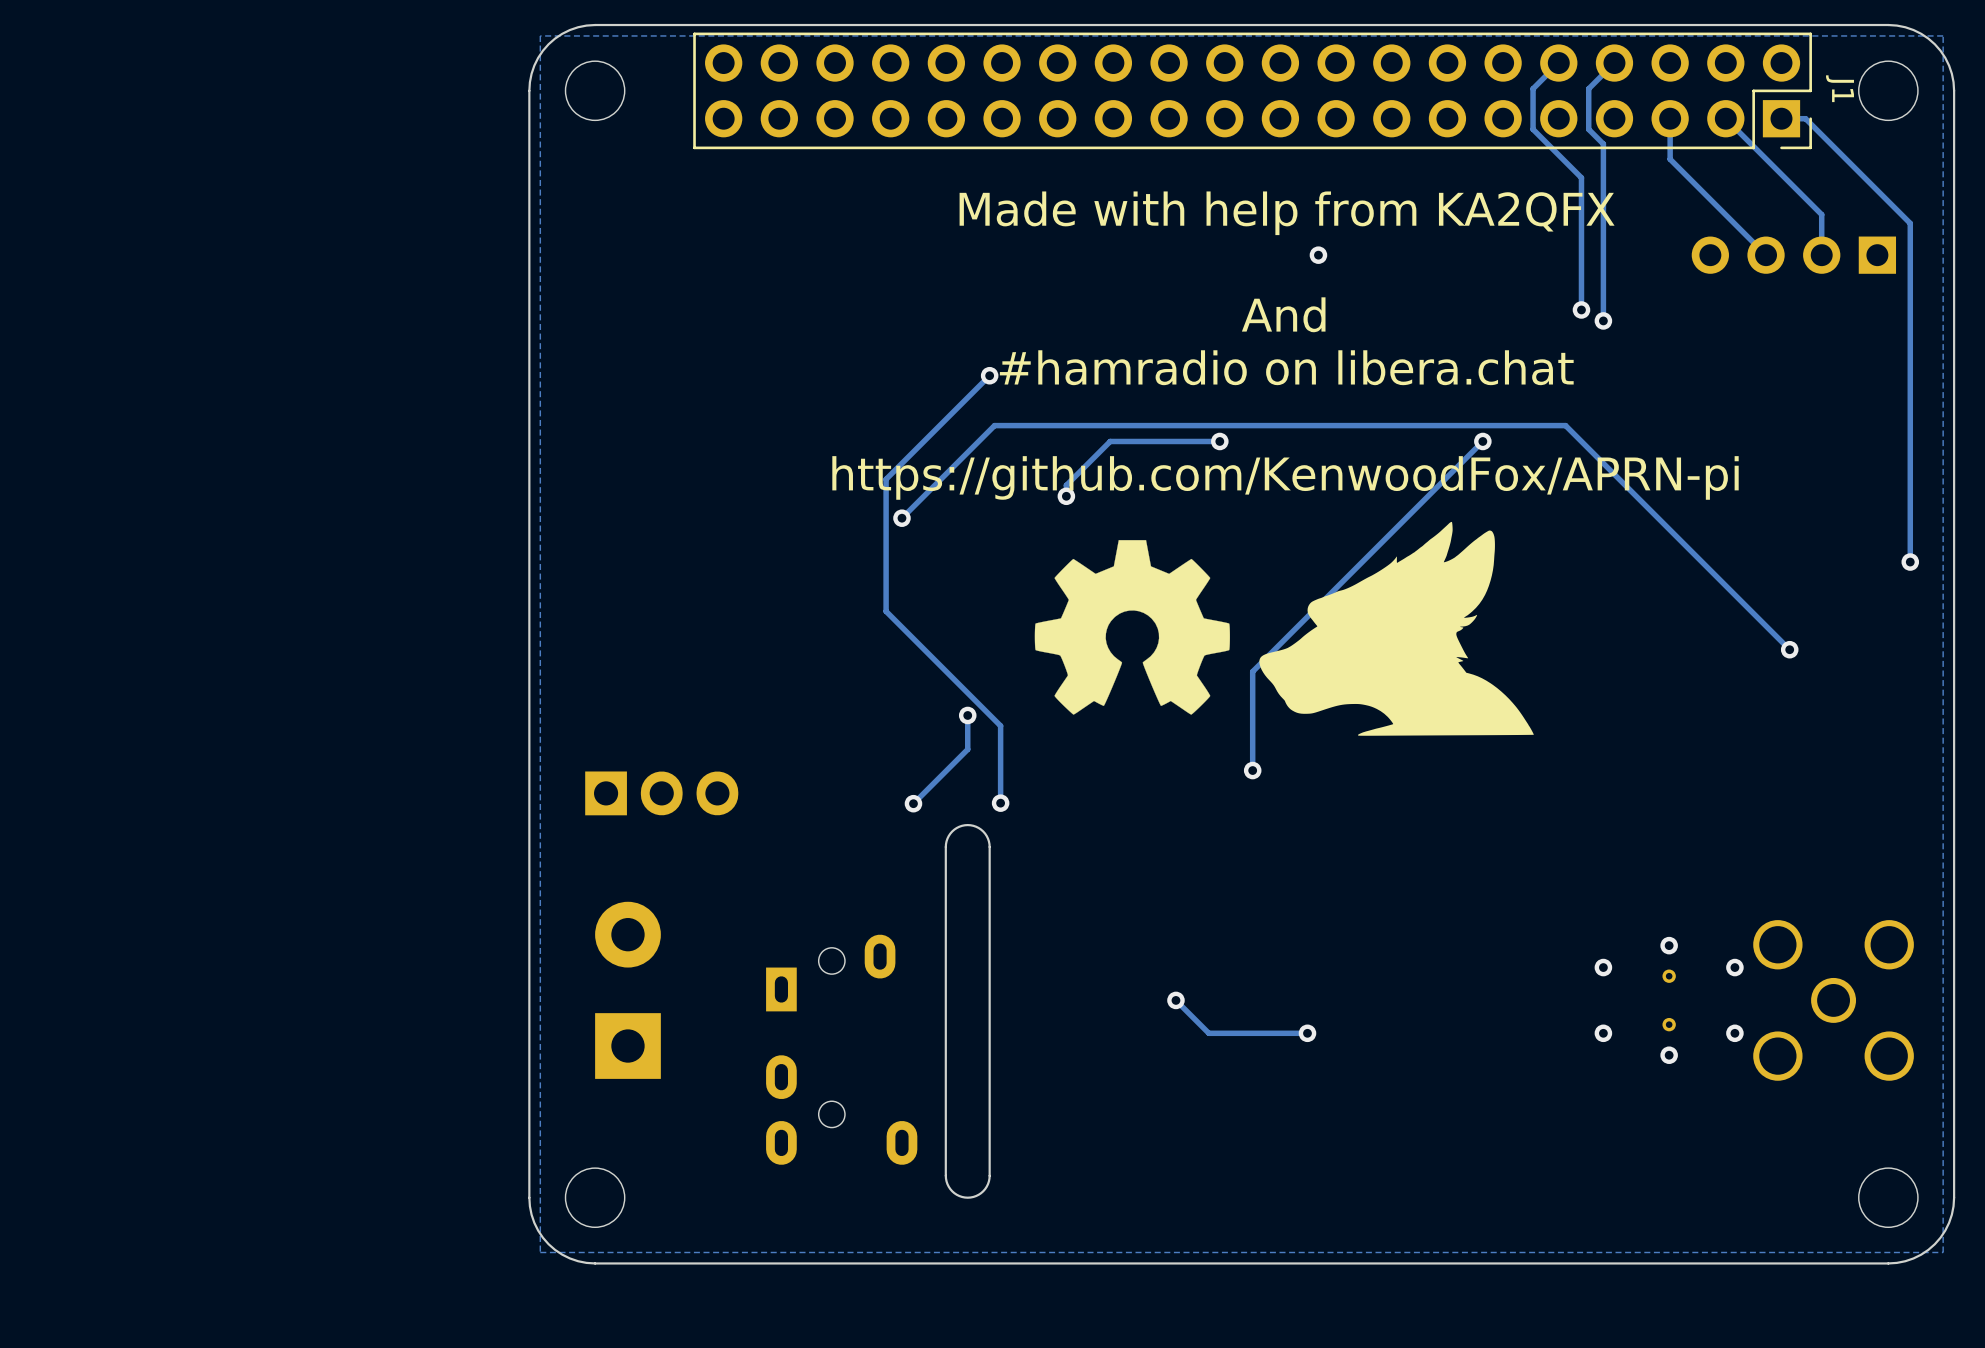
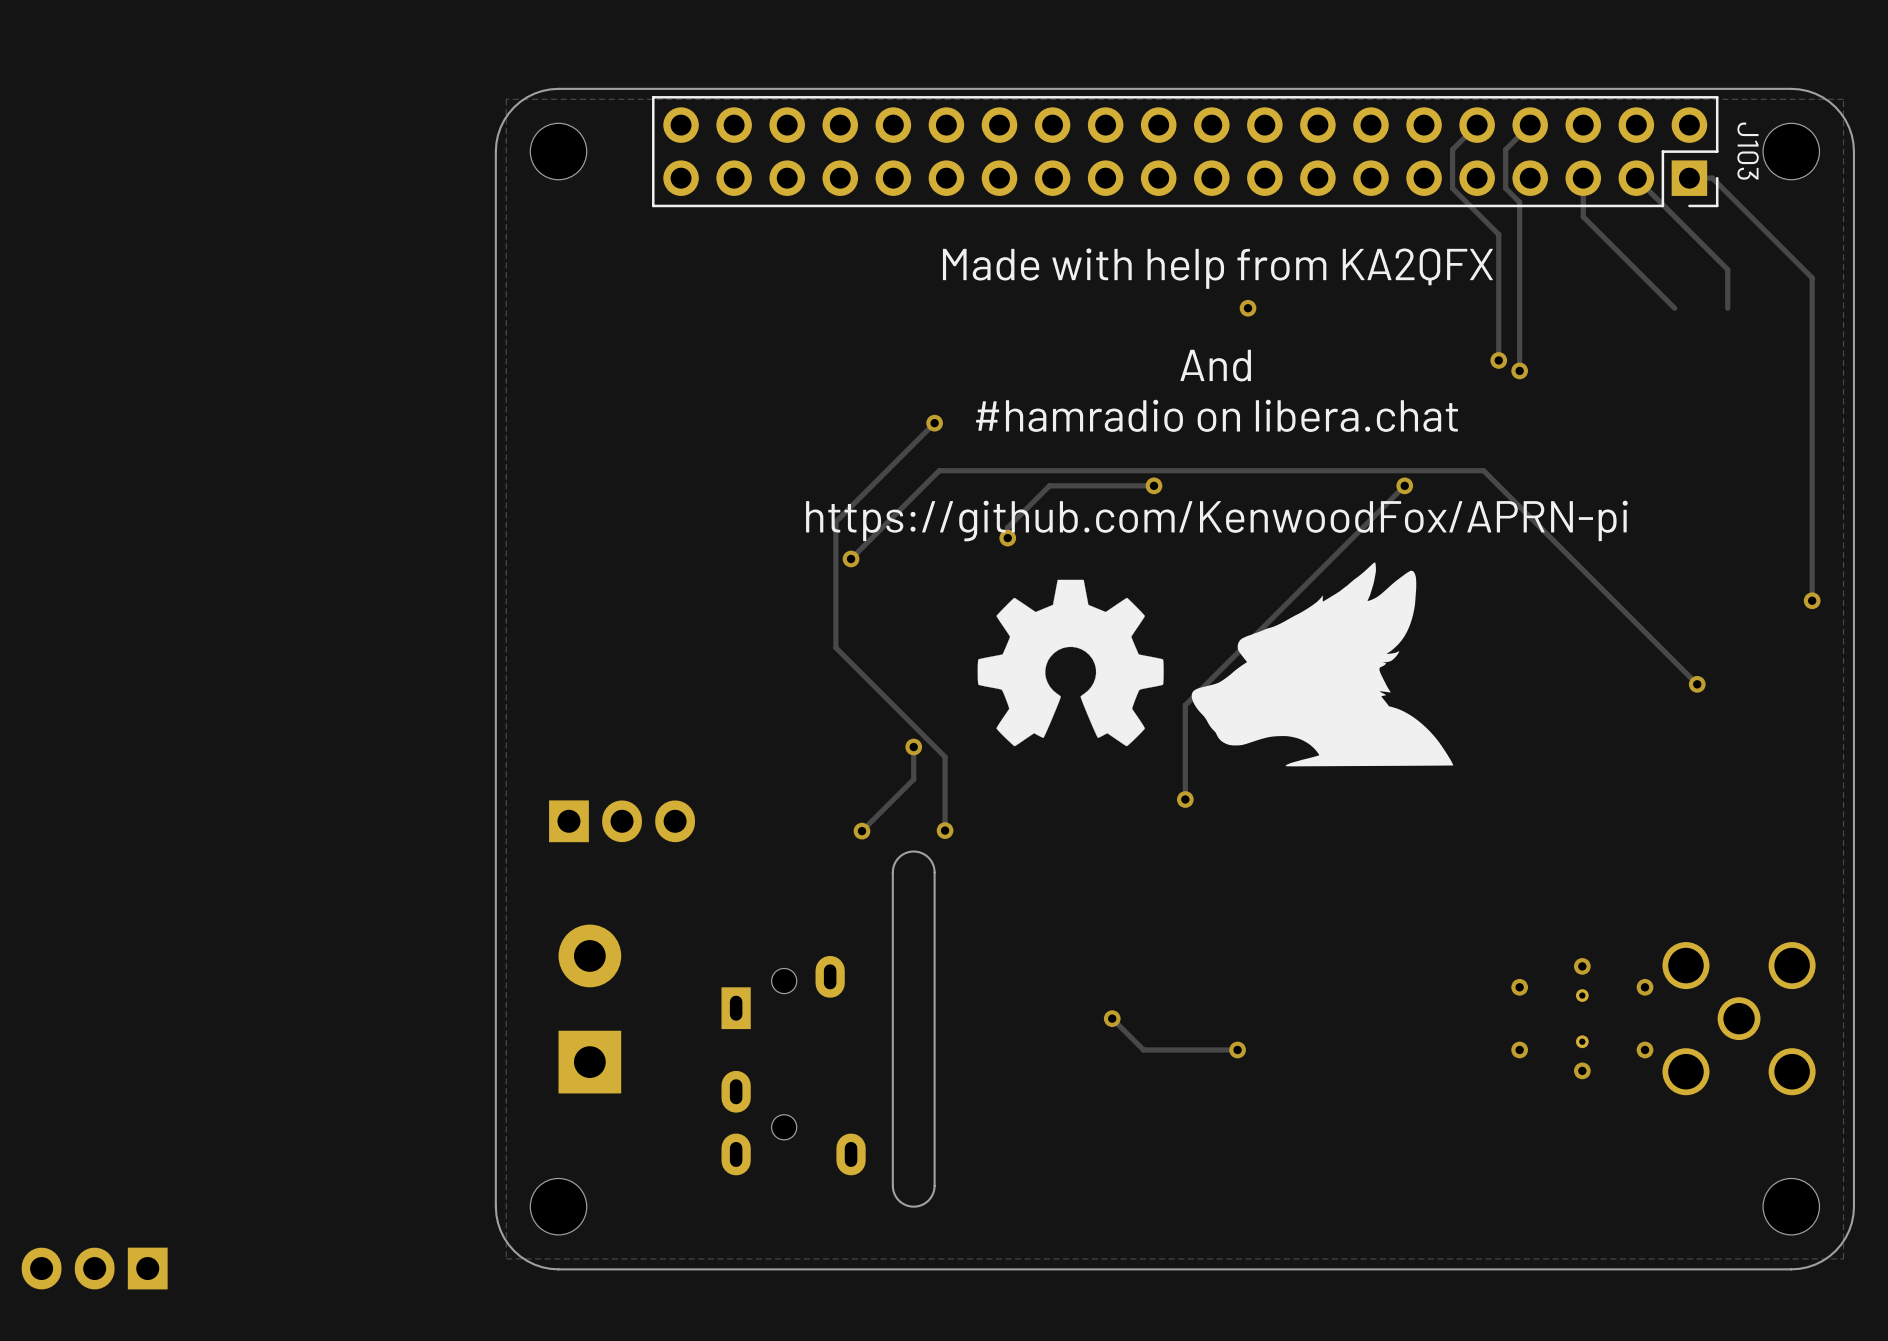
J1 name: J1 (1840, 88) -> J103 (1748, 151)
part: (1793, 255) -> none
part: none -> (94, 1268)

